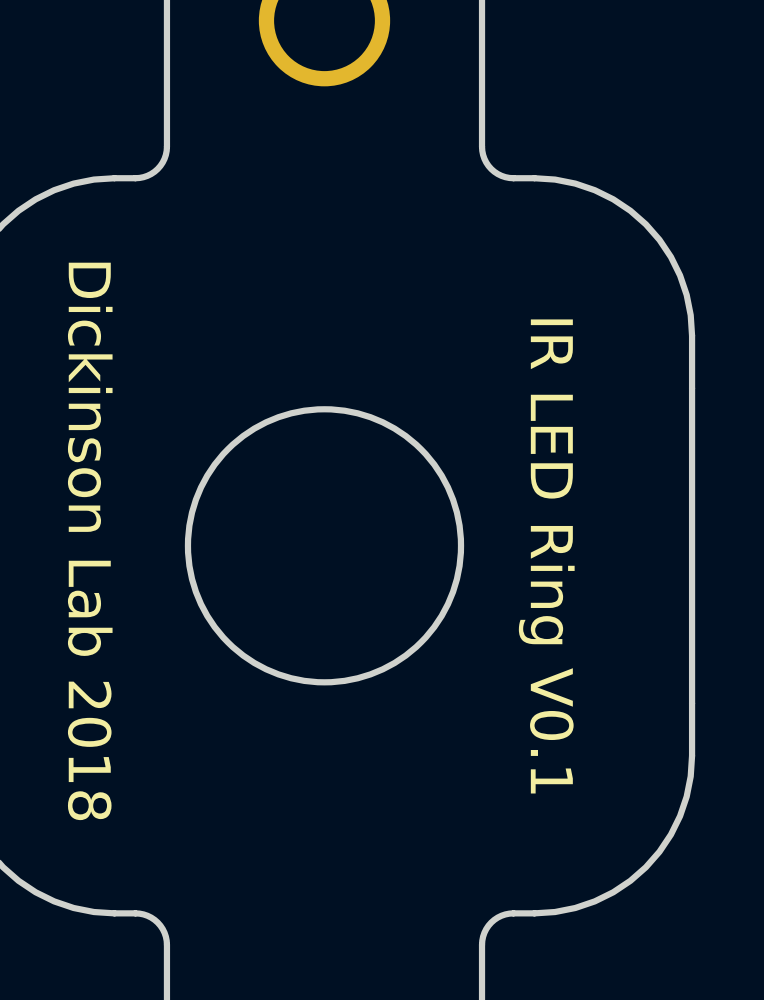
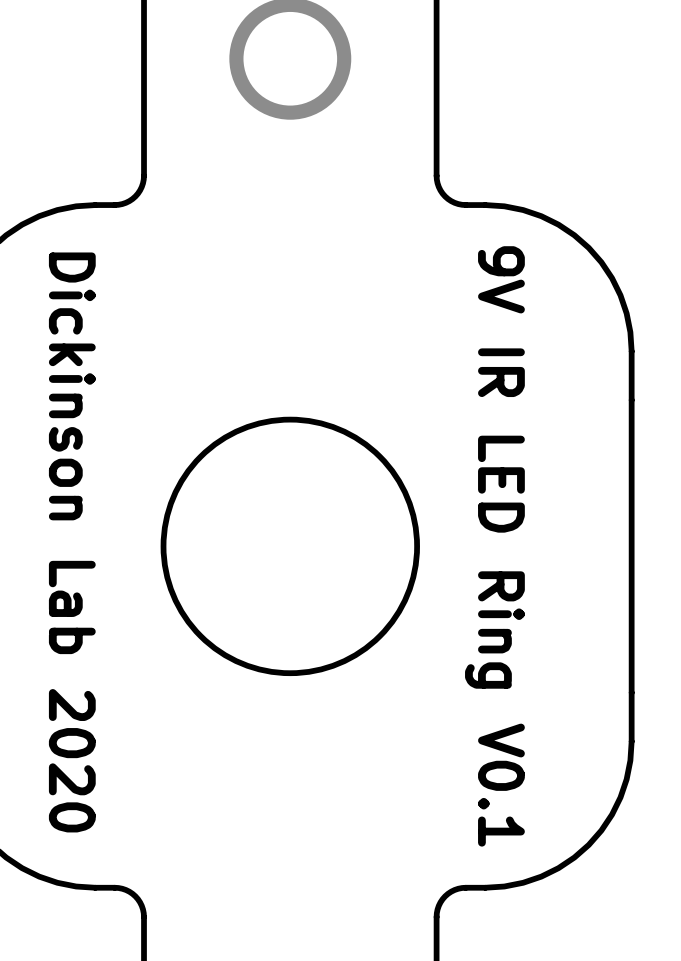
text: Dickinson Lab 2018 (90, 541) -> Dickinson Lab 2020 (72, 542)
text: IR LED Ring V0.1 (546, 556) -> 9V IR LED Ring V0.1 (494, 546)

